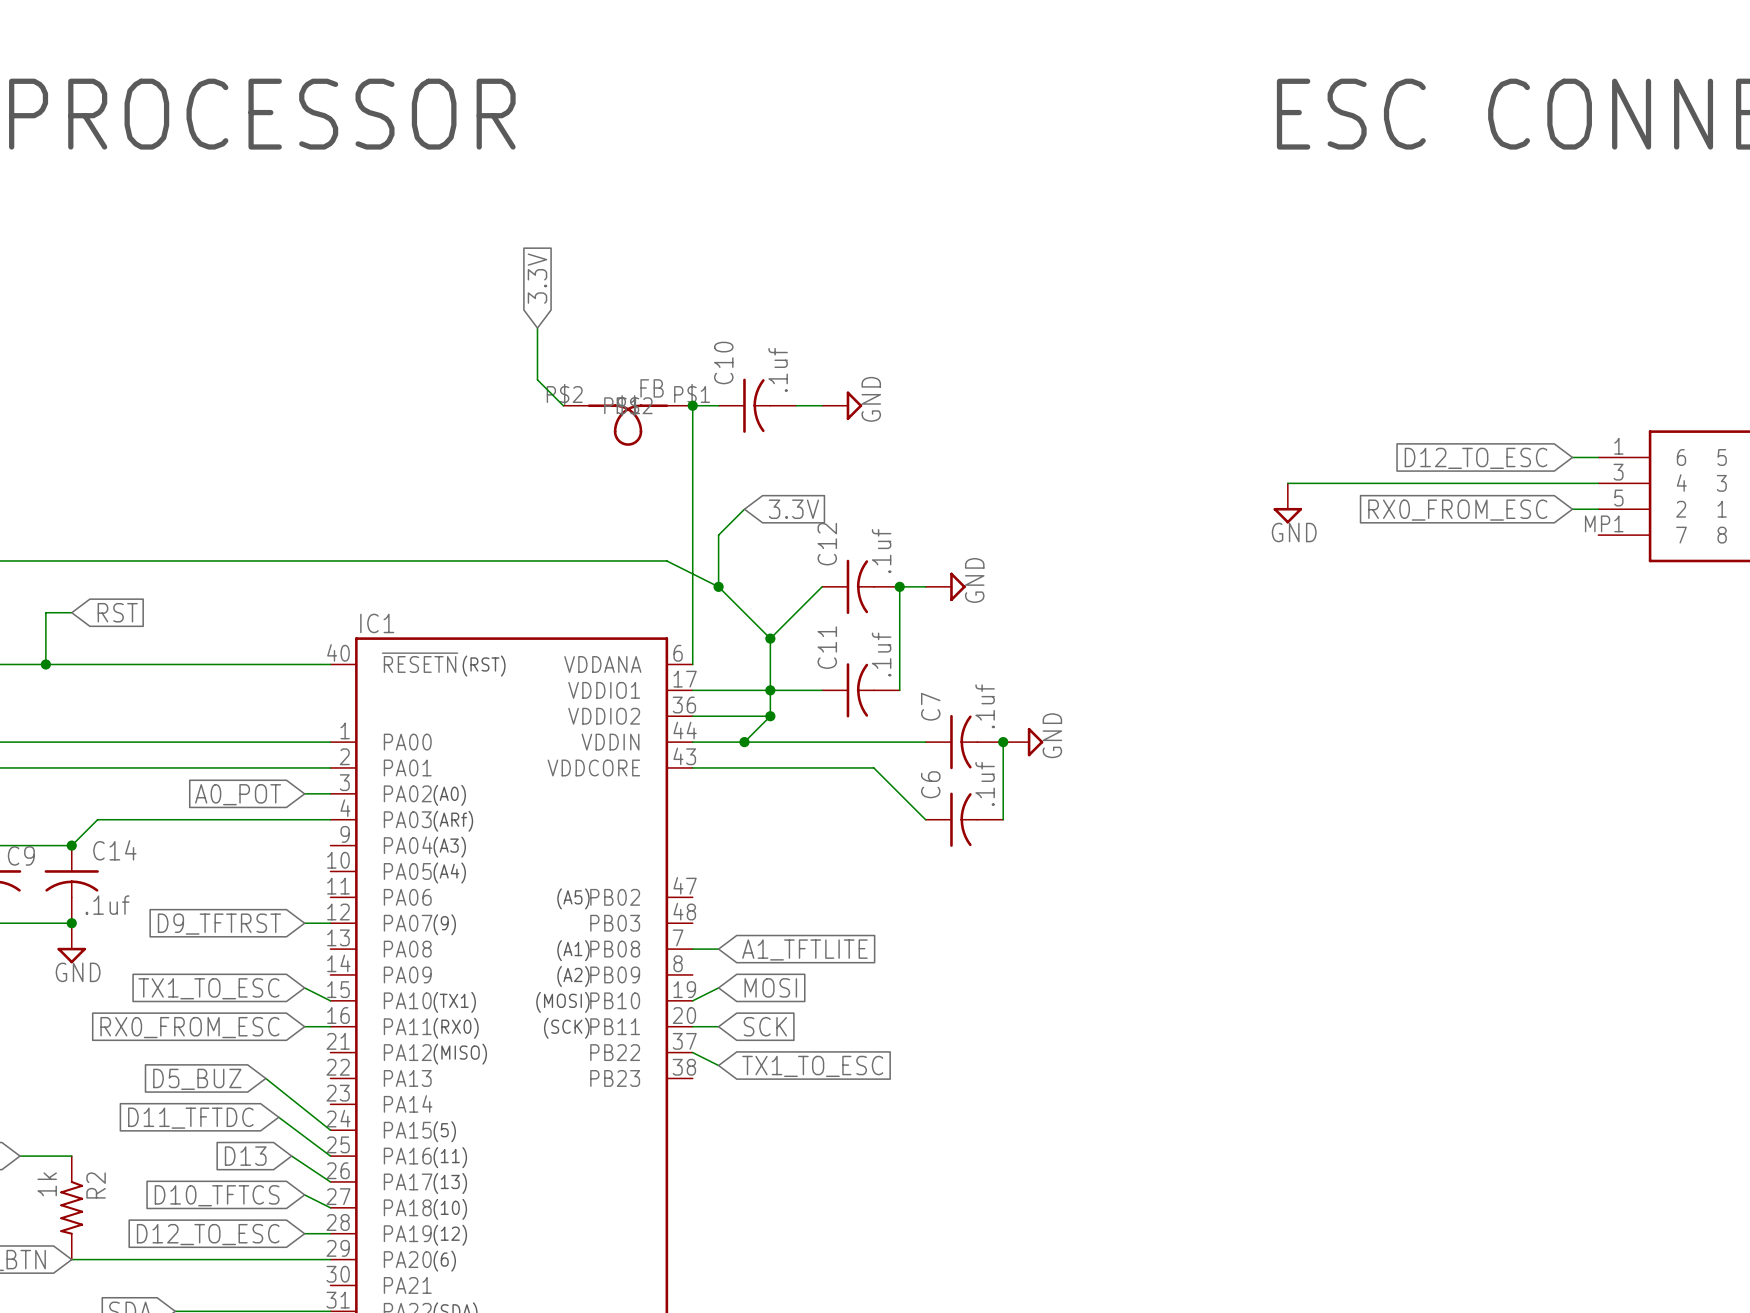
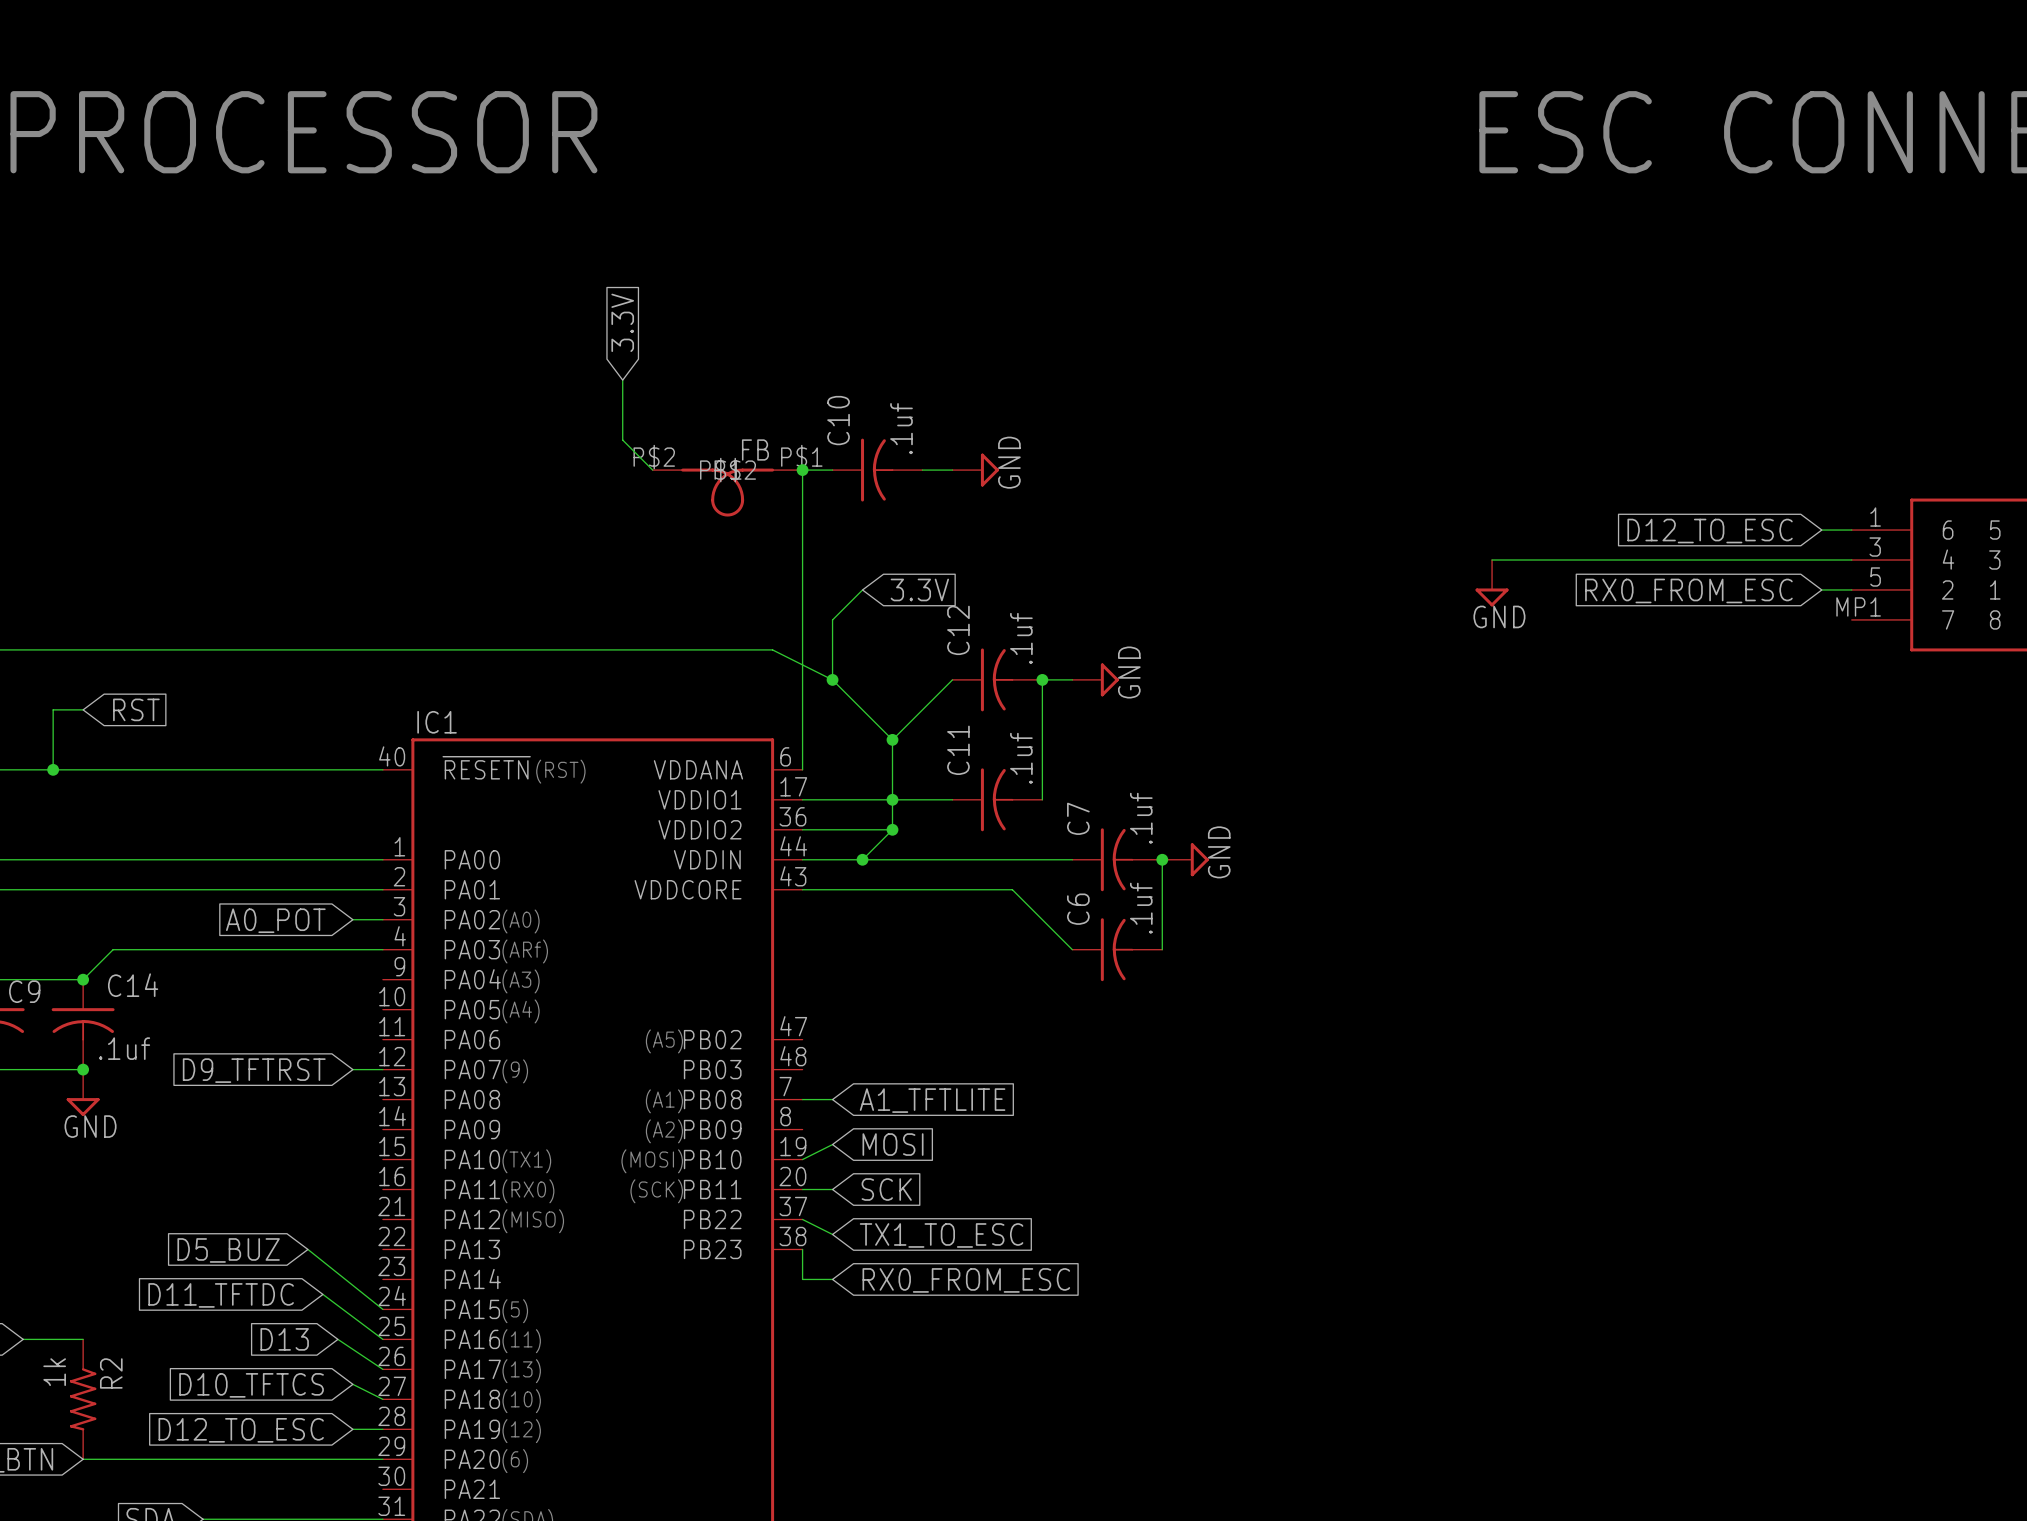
wire: (304, 987) (330, 1000) -> none
global label: TX1_TO_ESC (208, 988) -> none
wire: (304, 1026) (330, 1026) -> none
global label: RX0_FROM_ESC (189, 1027) -> none
wire: none -> (802, 1249) (802, 1279) (832, 1279)
global label: none -> RX0_FROM_ESC (966, 1280)

